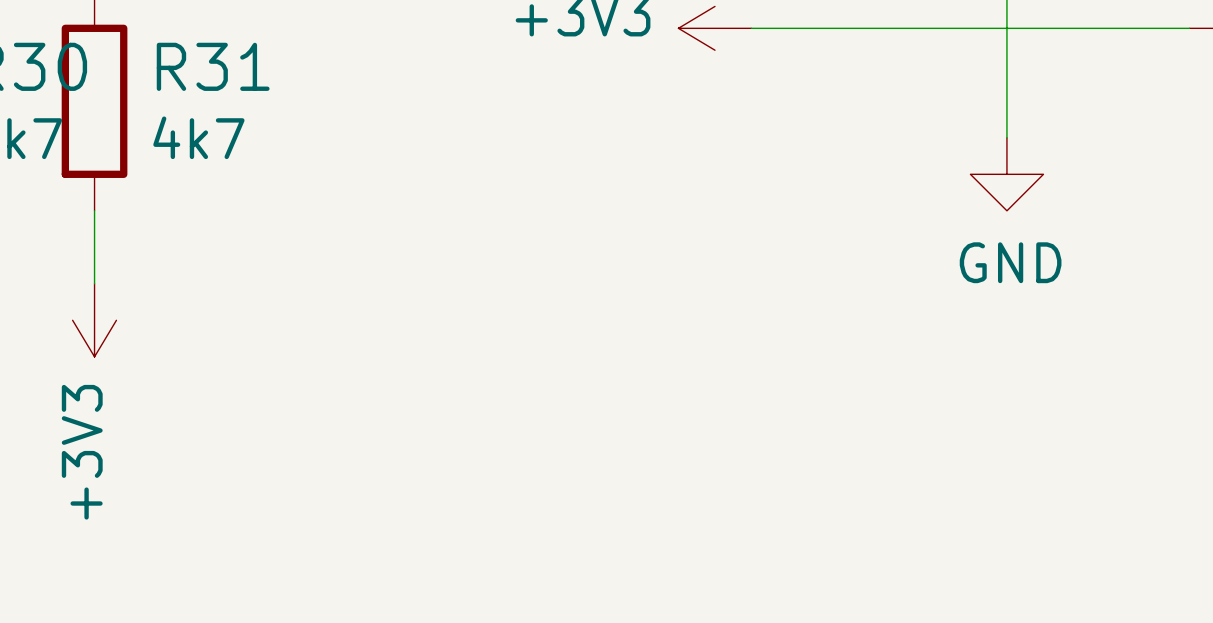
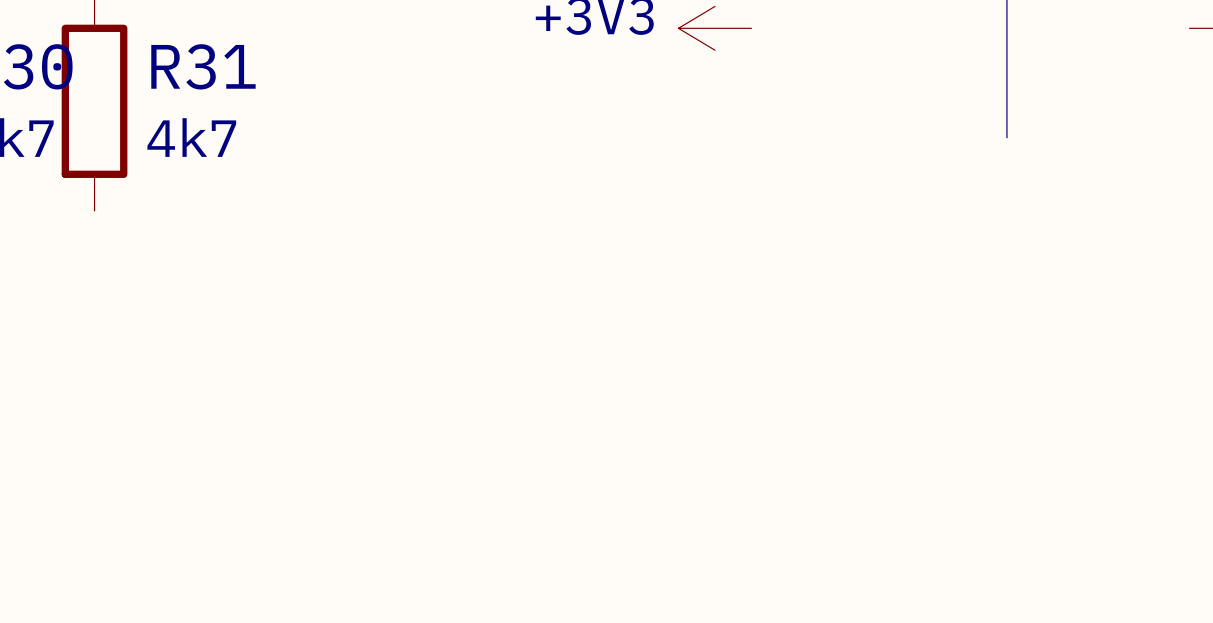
wire: (751, 28) (1189, 28) -> none
power symbol: GND (1006, 174) -> none
wire: (94, 210) (94, 283) -> none
power symbol: +3V3 (94, 320) -> none

